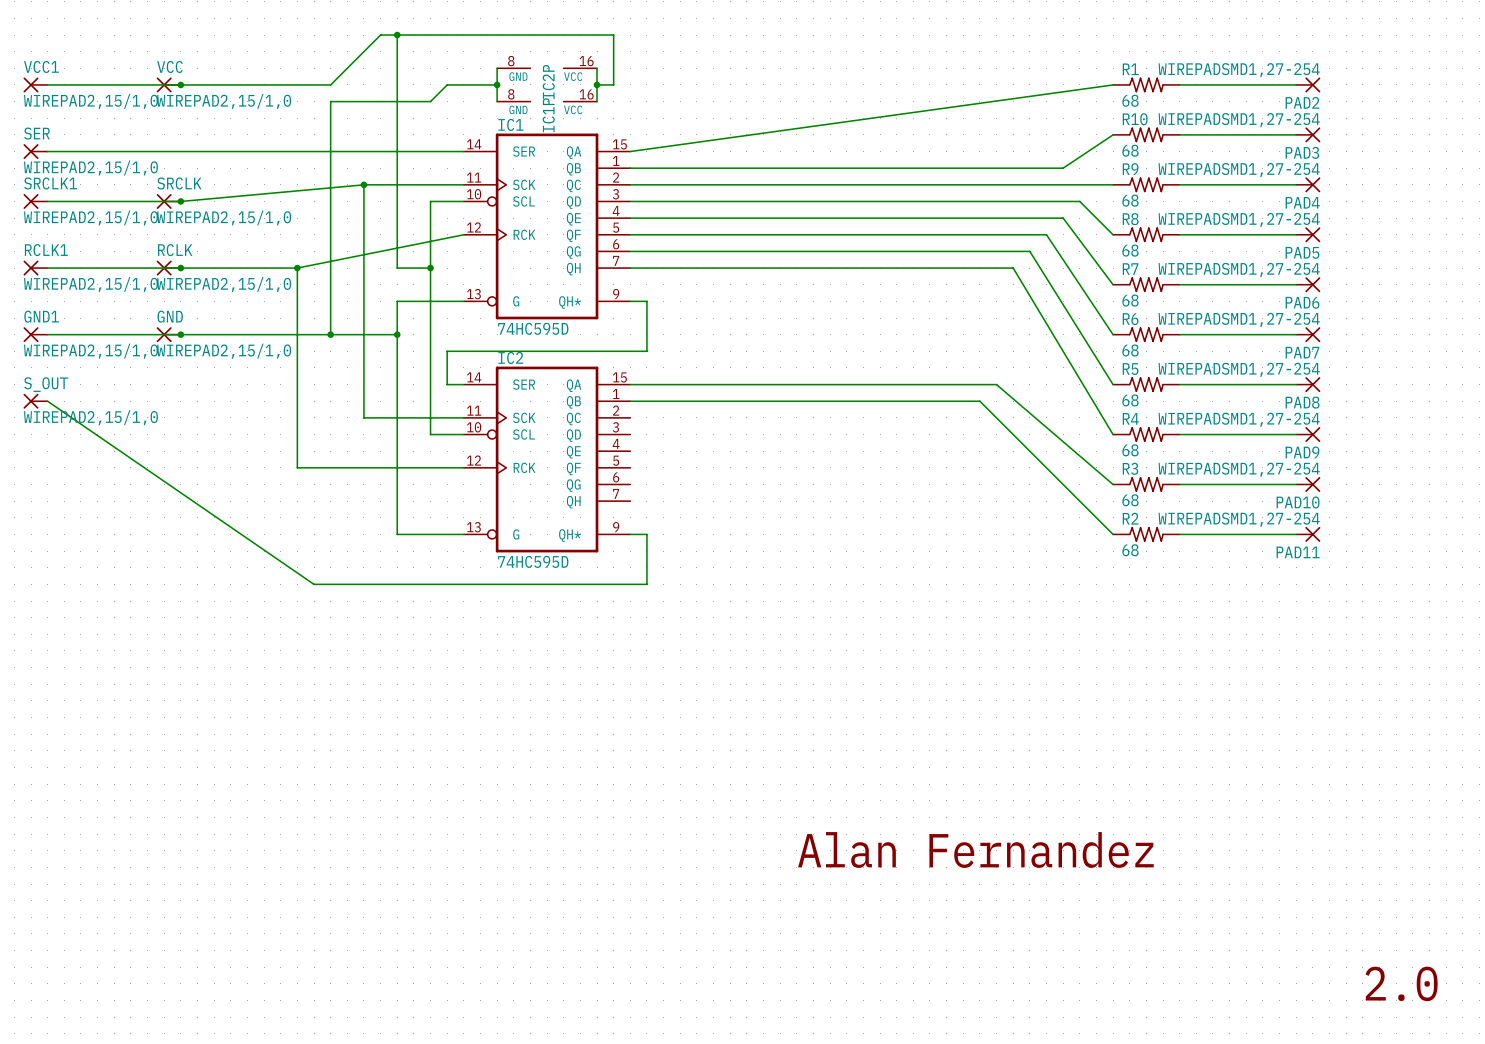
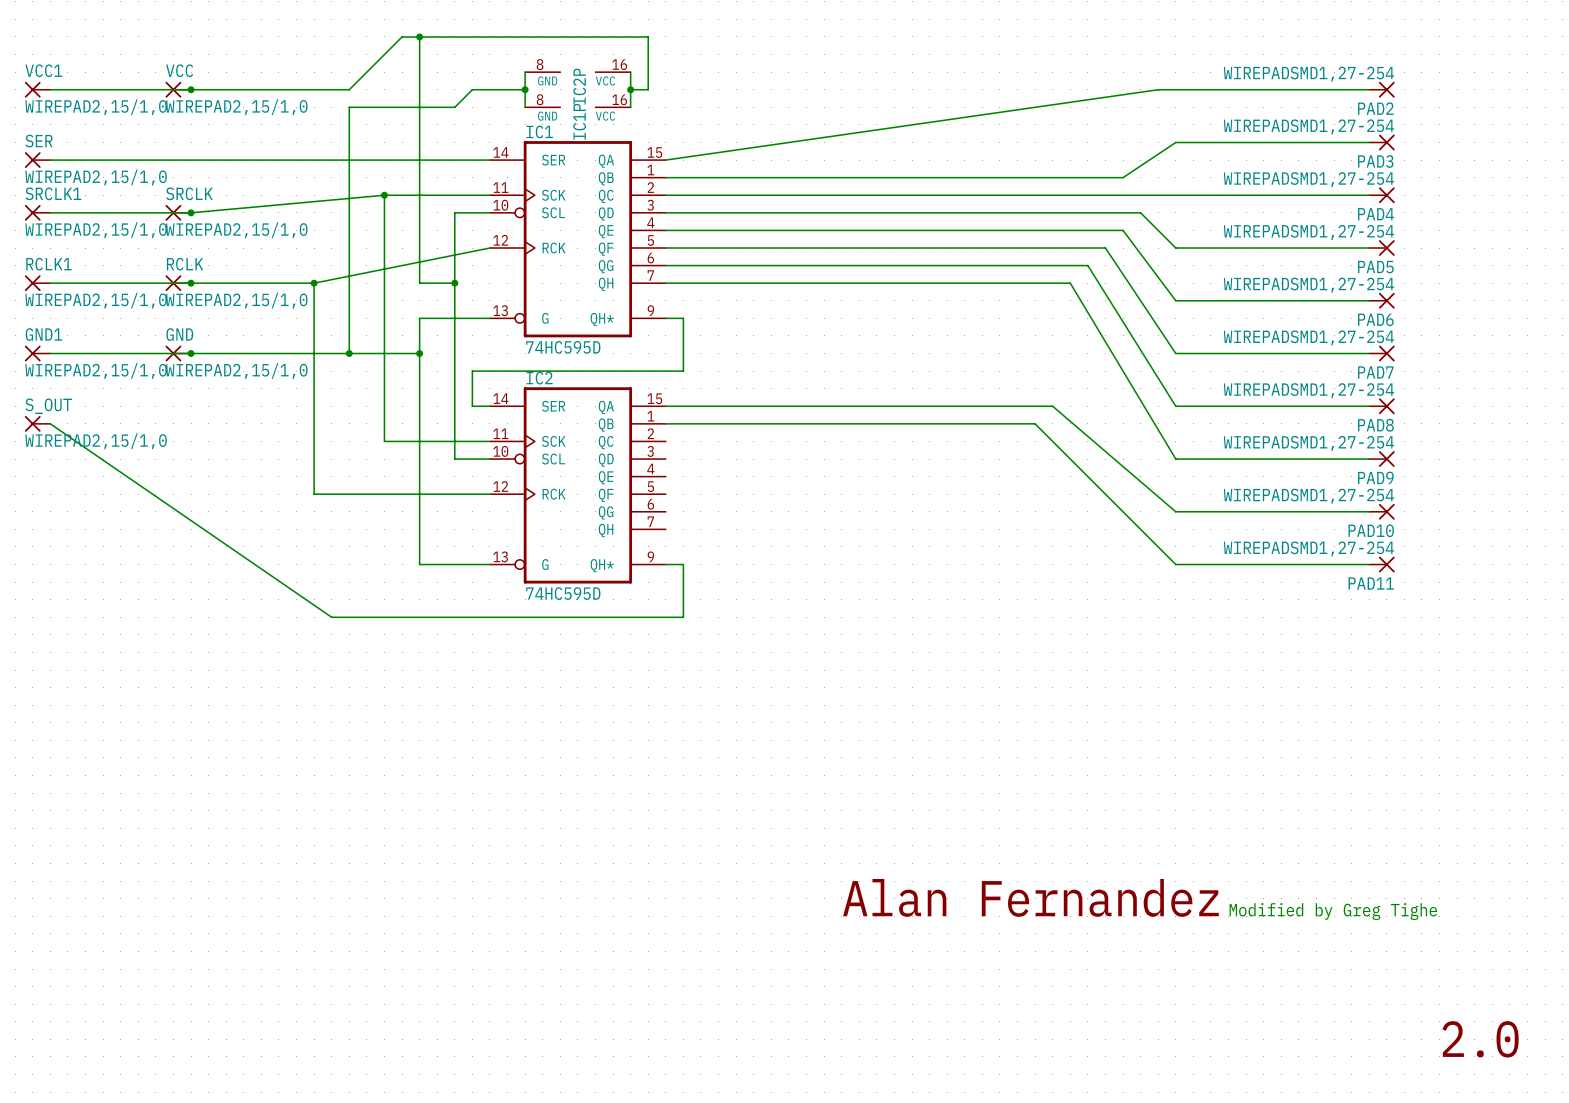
wire: (1113, 84) (630, 151) -> (1246, 89) (1158, 89) (665, 160)
R1: 68 (1146, 84) -> none
R10: 68 (1146, 134) -> none
R9: 68 (1146, 184) -> none
R8: 68 (1146, 234) -> none
R7: 68 (1146, 284) -> none
R6: 68 (1146, 334) -> none
R5: 68 (1146, 384) -> none
R4: 68 (1146, 434) -> none
R3: 68 (1146, 484) -> none
R2: 68 (1146, 534) -> none
text: none -> Modified by Greg Tighe (1333, 911)

